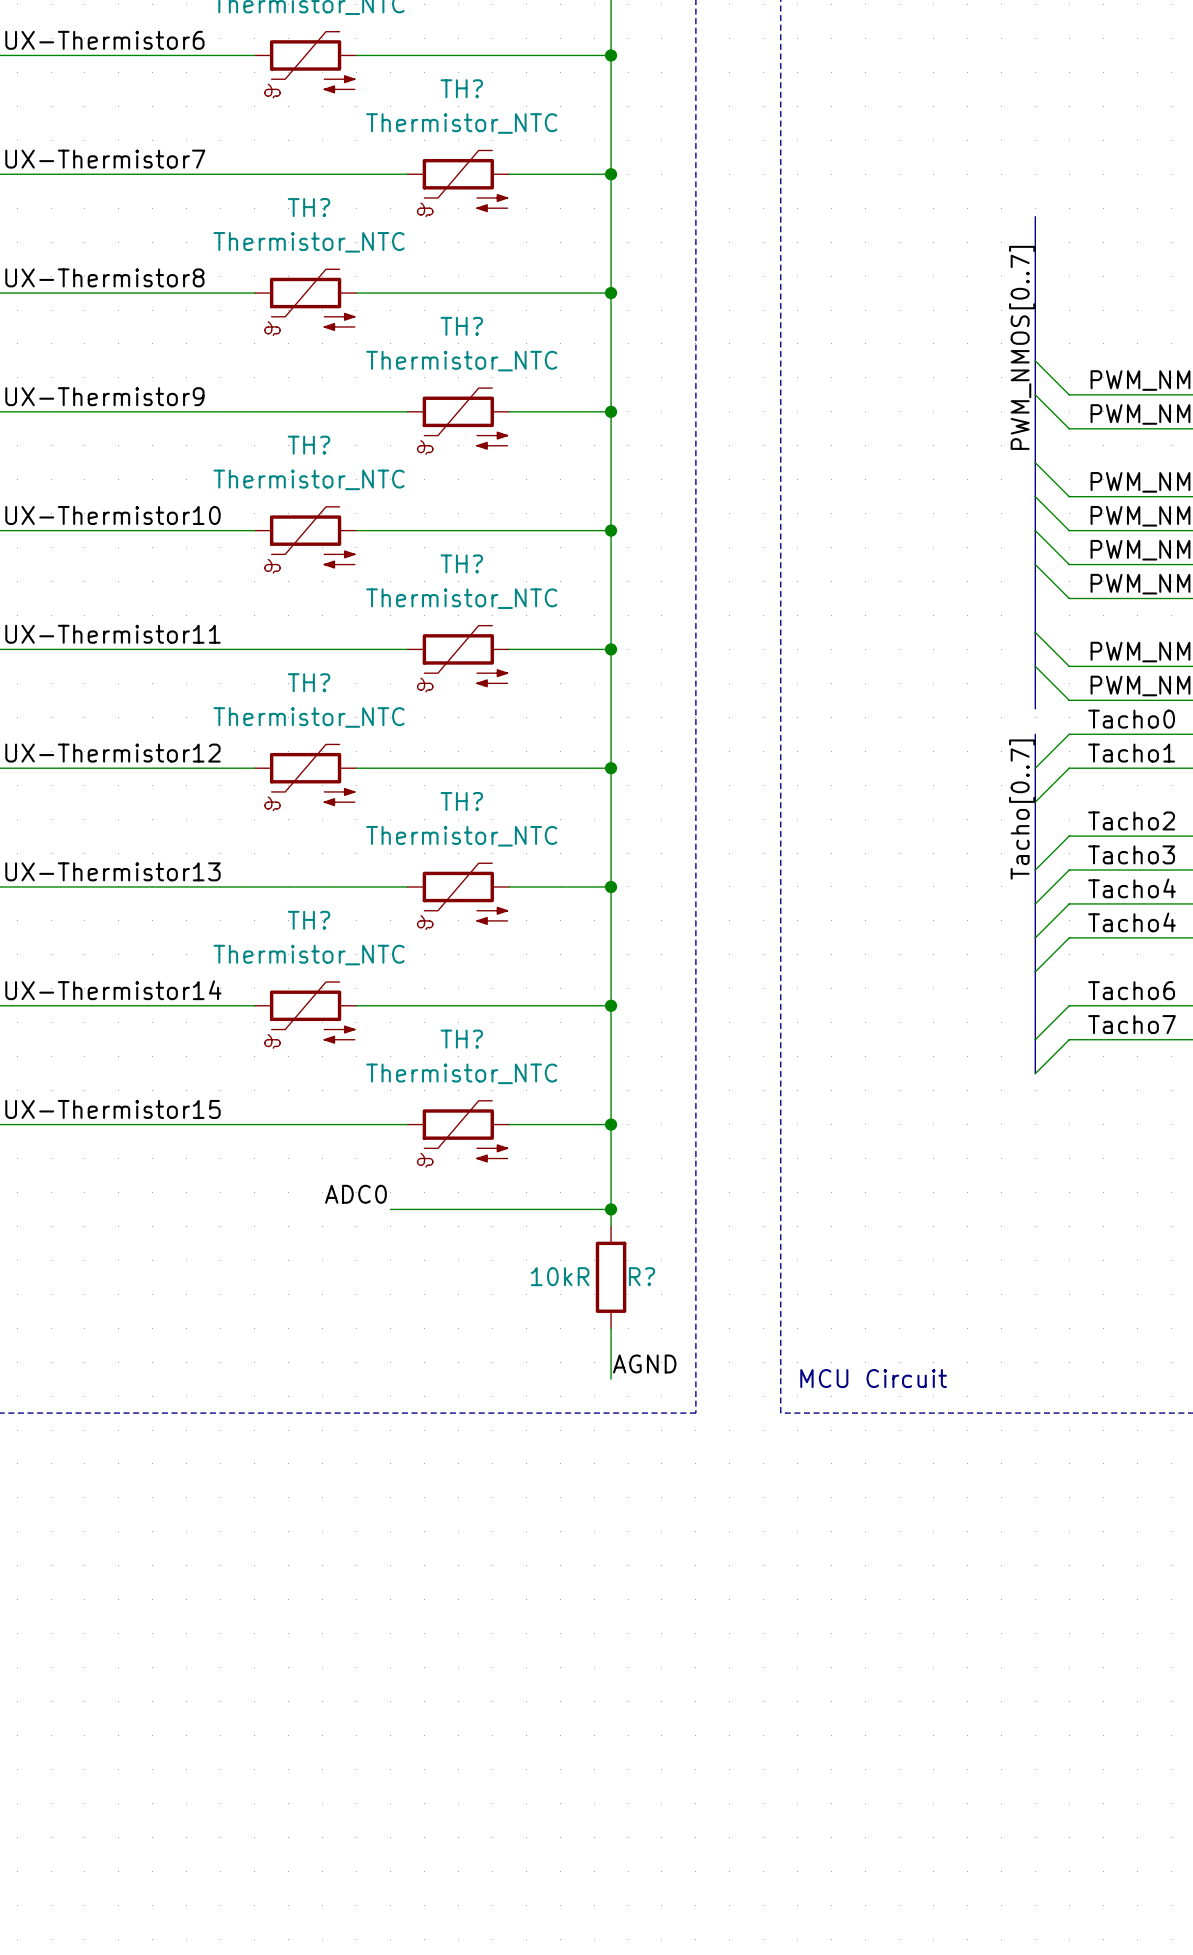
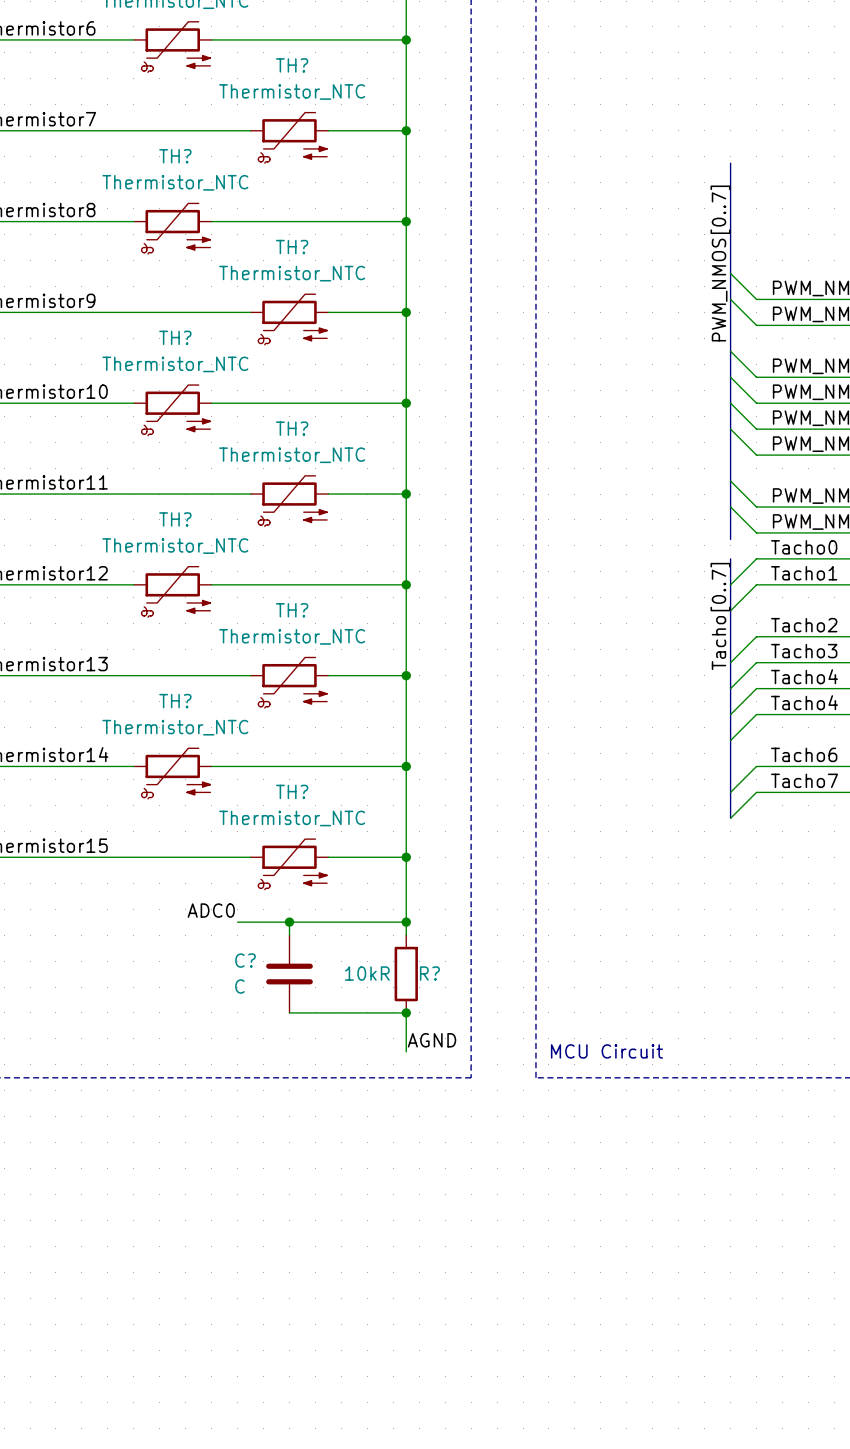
wire: none -> (289, 922) (289, 935)
junction: none -> (289, 922)
C?: none -> C (289, 974)
wire: none -> (289, 1012) (406, 1012)
junction: none -> (406, 1012)

